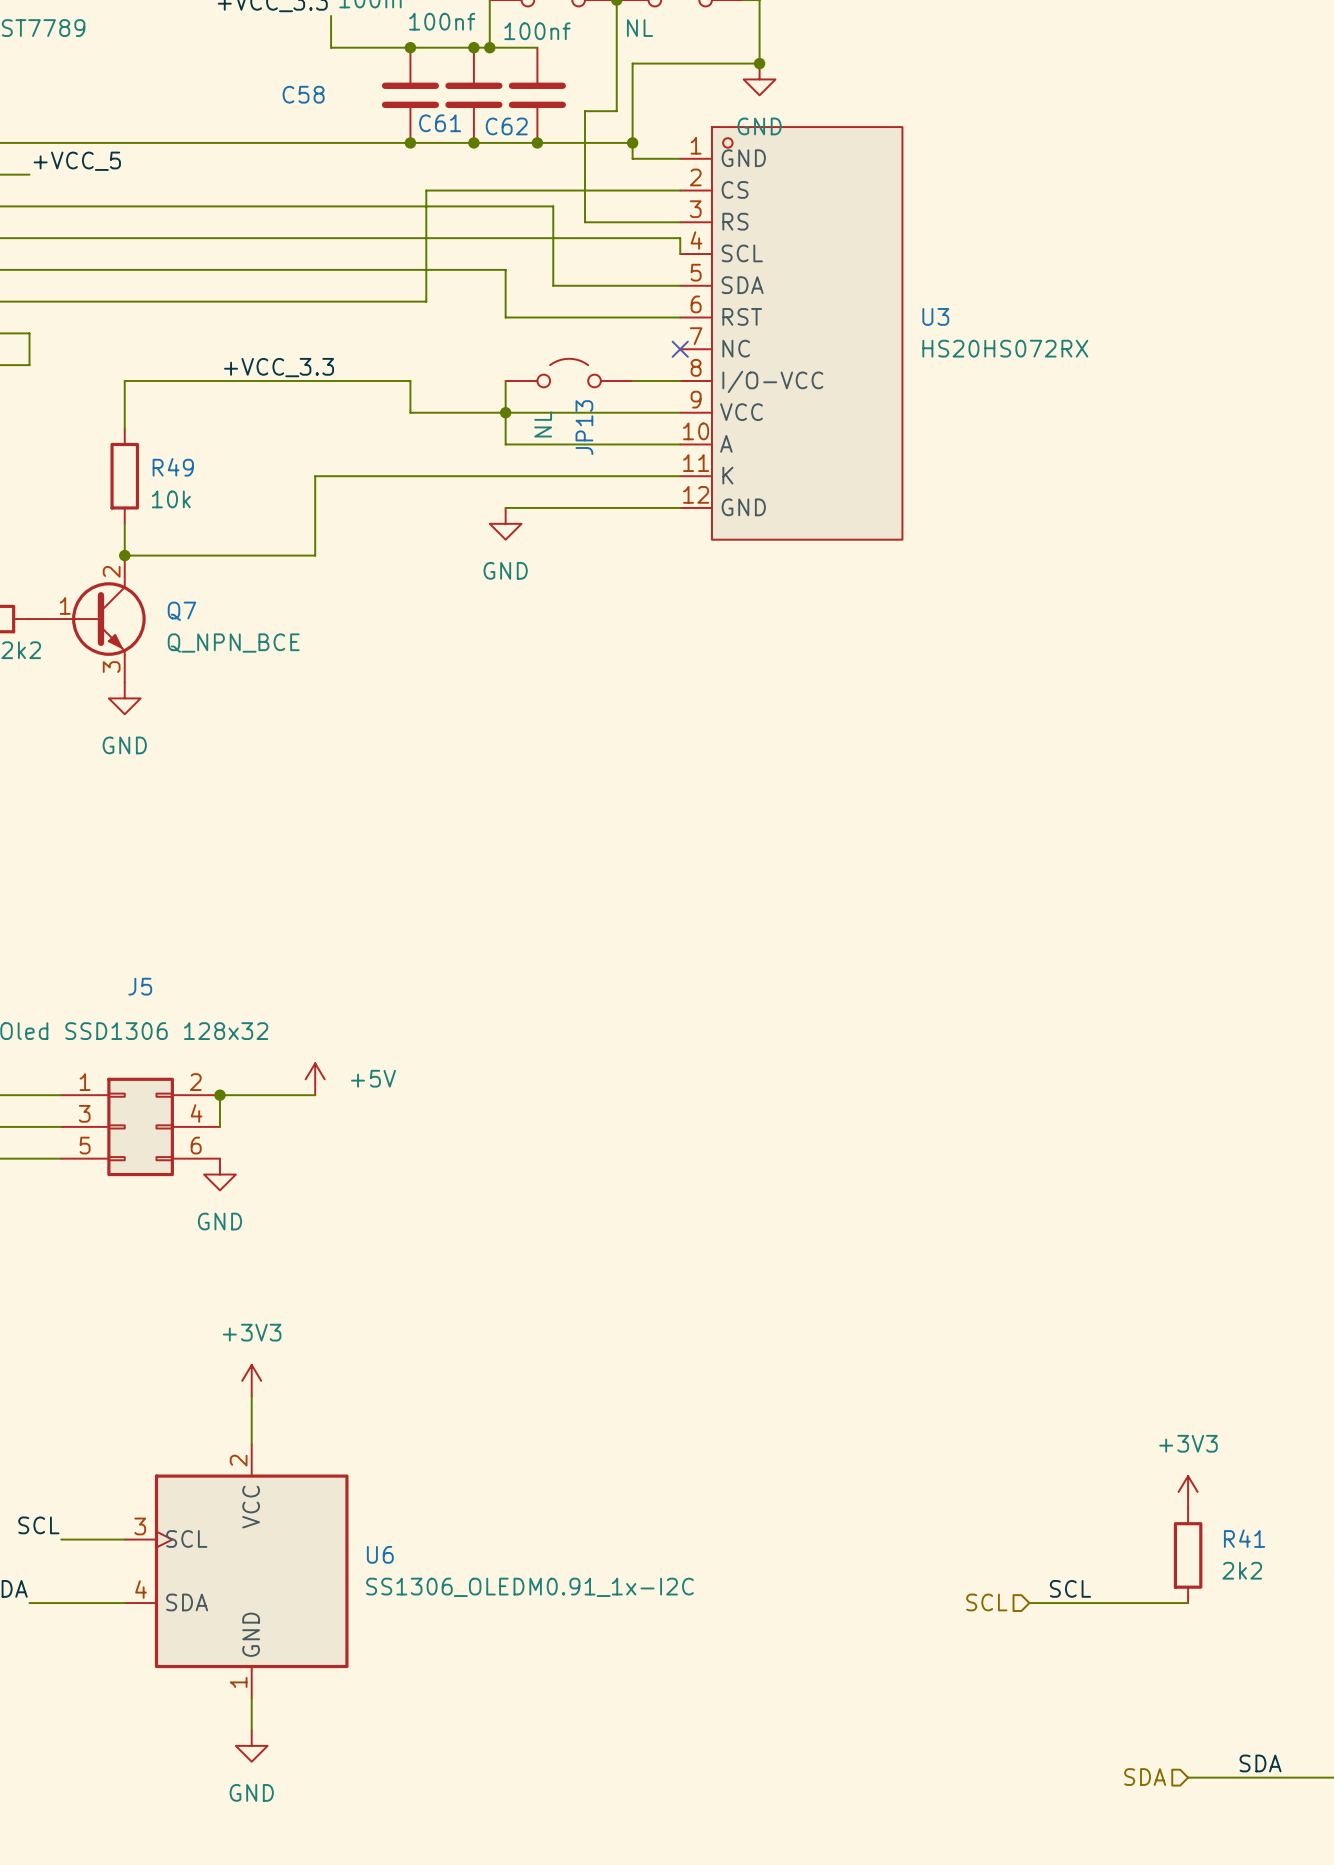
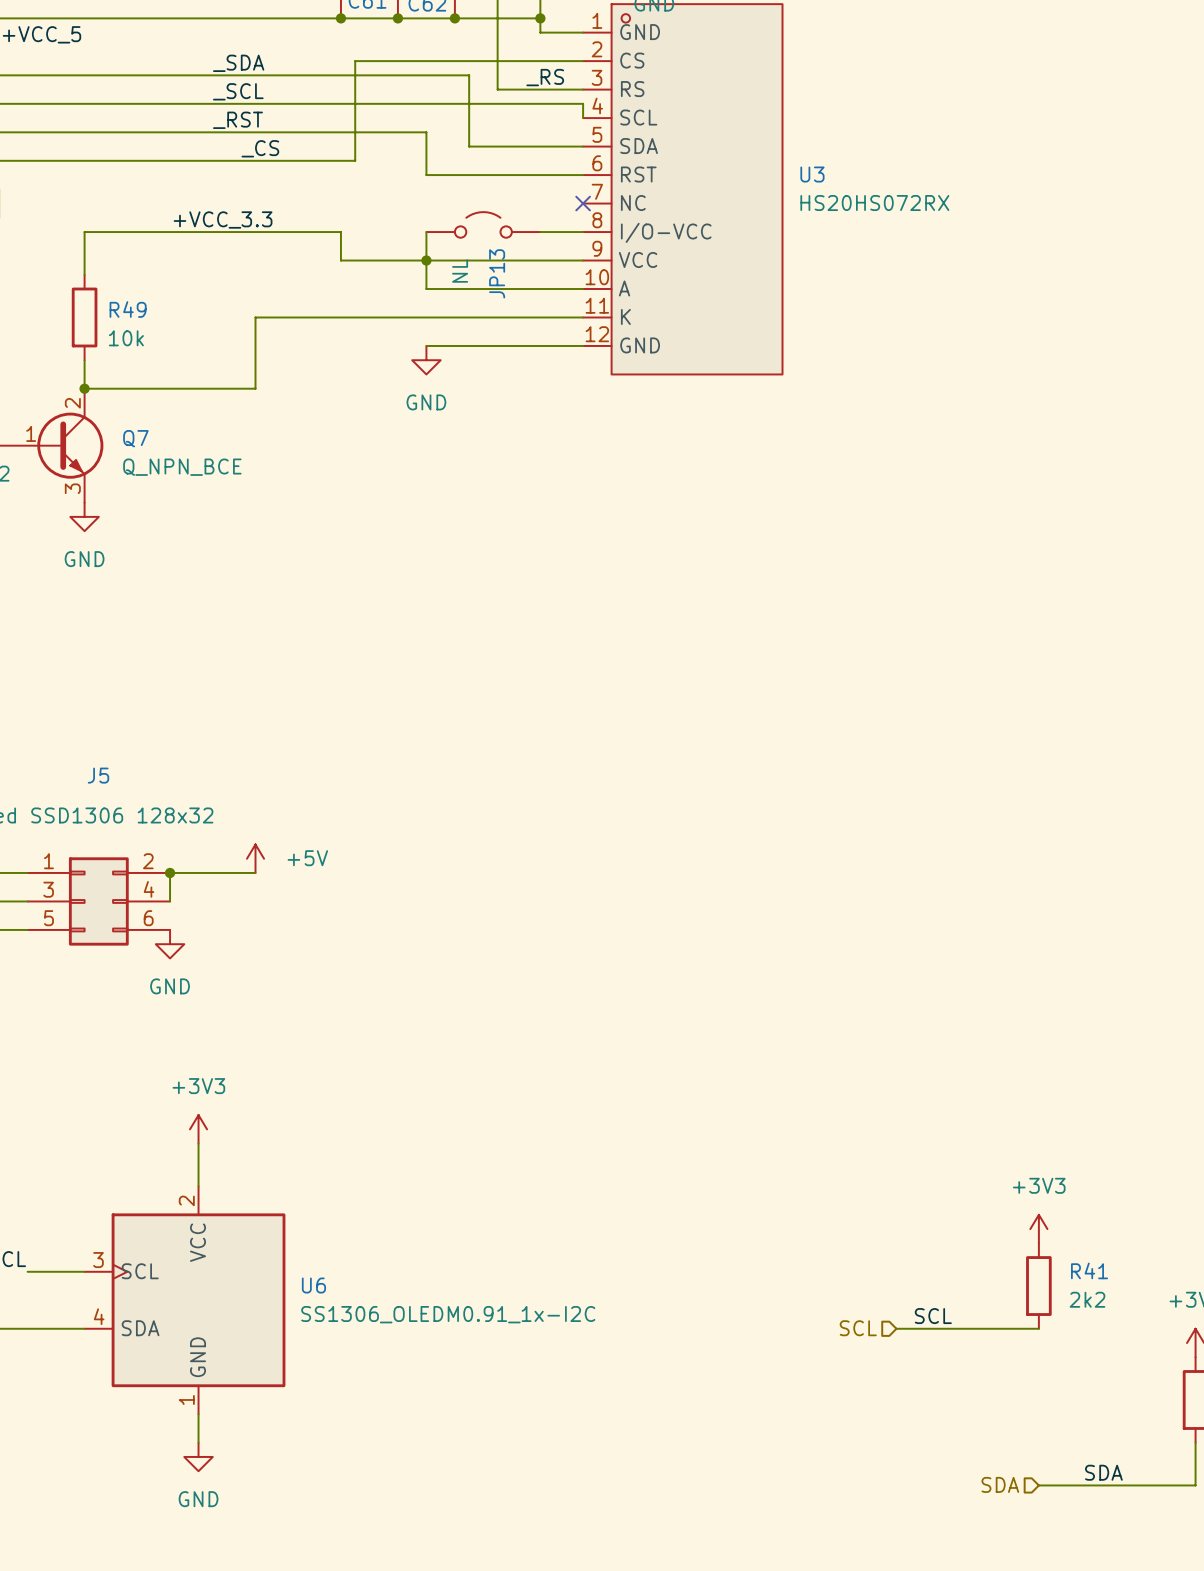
label: none -> _SDA (238, 63)
label: none -> _RS (545, 77)
label: none -> _SCL (238, 91)
label: none -> _RST (237, 120)
label: none -> _CS (260, 148)

